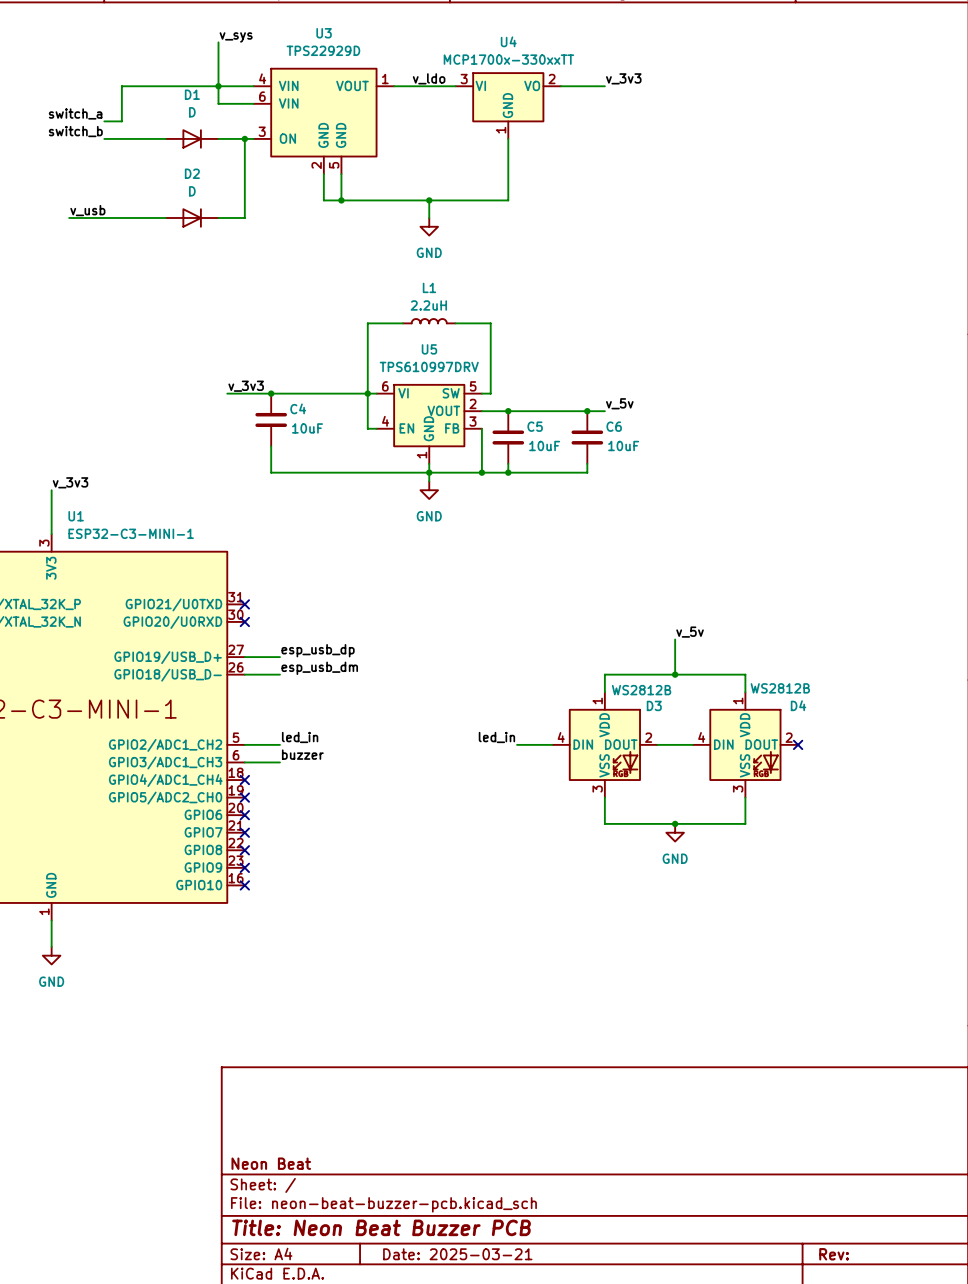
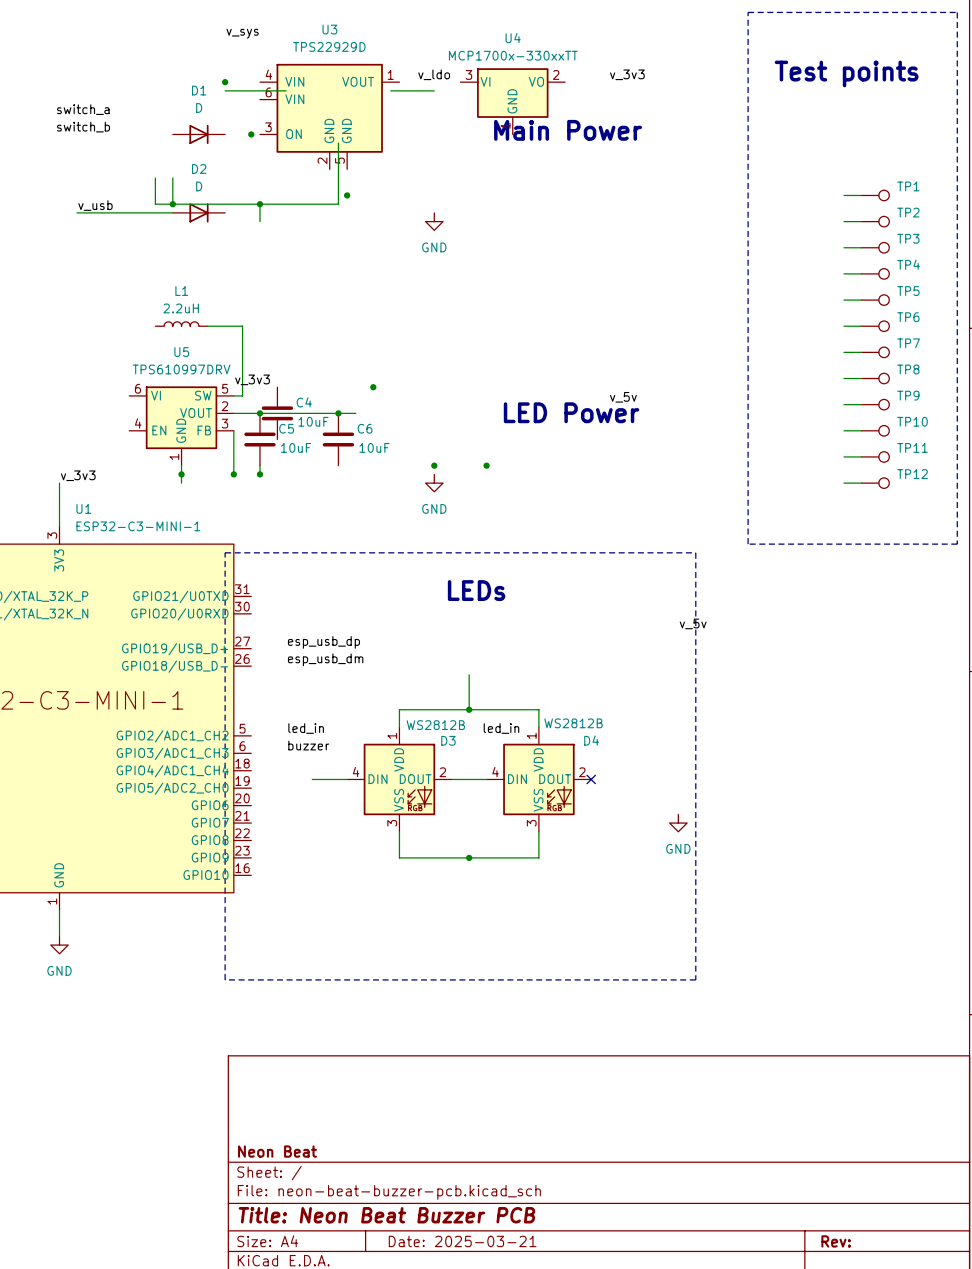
line: none -> (748, 12) (957, 12) (957, 544) (748, 544) (748, 12)
wire: (218, 42) (218, 103) (253, 103) -> none
text: none -> Test points (846, 73)
wire: (253, 86) (121, 86) (121, 121) (104, 121) -> none
wire: (394, 86) (455, 86) -> none
wire: (560, 86) (604, 86) -> none
wire: none -> (390, 90) (434, 90)
text: none -> Main Power (568, 130)
wire: (104, 138) (165, 138) -> (225, 90) (286, 90)
wire: (218, 138) (253, 138) -> none
wire: (244, 138) (244, 217) (218, 217) -> none
wire: (508, 138) (508, 200) (323, 200) (323, 174) -> none
wire: none -> (338, 143) (338, 204) (155, 204) (155, 178)
wire: (341, 174) (341, 200) -> none
wire: none -> (172, 178) (172, 204)
wire: (429, 200) (429, 217) -> none
junction: (429, 200) -> none
wire: none -> (843, 195) (861, 195)
TP1: none -> (875, 195)
junction: none -> (172, 204)
wire: none -> (259, 204) (259, 221)
junction: none -> (259, 204)
wire: none -> (843, 221) (861, 221)
TP2: none -> (875, 221)
wire: none -> (843, 247) (861, 247)
TP3: none -> (875, 247)
wire: none -> (843, 273) (861, 273)
TP4: none -> (875, 273)
wire: none -> (843, 300) (861, 300)
TP5: none -> (875, 300)
L1 position: (429, 321) -> (181, 324)
wire: (402, 323) (367, 323) (367, 428) (376, 428) -> none
wire: (455, 323) (490, 323) (490, 393) (481, 393) -> none
wire: none -> (207, 326) (242, 326) (242, 395) (233, 395)
wire: none -> (843, 326) (861, 326)
TP6: none -> (875, 326)
wire: none -> (843, 352) (861, 352)
TP7: none -> (875, 352)
wire: none -> (843, 378) (861, 378)
TP8: none -> (875, 378)
wire: (227, 393) (376, 393) -> none
junction position: (271, 393) -> (259, 413)
wire: (481, 411) (604, 411) -> none
junction: (508, 411) -> none
junction: (587, 411) -> none
wire: none -> (843, 404) (861, 404)
TP9: none -> (875, 404)
wire: none -> (233, 413) (355, 413)
junction: none -> (338, 413)
text: none -> LED Power (571, 412)
U5 position: (429, 423) -> (181, 426)
wire: (481, 428) (481, 472) -> none
wire: none -> (233, 430) (233, 474)
C5 position: (508, 437) -> (259, 439)
C6 position: (587, 437) -> (338, 439)
wire: none -> (843, 430) (861, 430)
TP10: none -> (875, 430)
wire: (271, 446) (271, 472) (587, 472) (587, 463) -> none
wire: (429, 463) (429, 481) -> none
wire: (508, 463) (508, 472) -> none
wire: none -> (843, 456) (861, 456)
TP11: none -> (875, 456)
wire: none -> (181, 465) (181, 483)
wire: none -> (259, 465) (259, 474)
junction: (508, 472) -> none
junction: none -> (181, 474)
junction: none -> (233, 474)
junction: none -> (259, 474)
wire: none -> (843, 483) (861, 483)
TP12: none -> (875, 483)
line: none -> (225, 552) (695, 552) (695, 979) (225, 979) (225, 552)
text: none -> LEDs (476, 590)
no-connect mark: (244, 604) -> none
no-connect mark: (244, 621) -> none
wire: (675, 639) (675, 674) -> none
wire: (244, 657) (279, 657) -> none
wire: (244, 674) (279, 674) -> none
junction: (675, 674) -> none
wire: none -> (469, 674) (469, 709)
wire: (604, 692) (604, 674) (745, 674) (745, 692) -> none
junction: none -> (469, 709)
wire: none -> (399, 727) (399, 709) (538, 709) (538, 727)
wire: (244, 744) (279, 744) -> none
wire: (517, 744) (552, 744) -> (451, 779) (486, 779)
D3 position: (604, 744) -> (399, 779)
wire: (657, 744) (692, 744) -> none
D4 position: (745, 744) -> (538, 779)
no-connect mark: (798, 744) -> none
wire: (244, 762) (279, 762) -> (312, 779) (347, 779)
no-connect mark: (244, 780) -> none
no-connect mark: none -> (591, 779)
no-connect mark: (244, 797) -> none
wire: (604, 797) (604, 823) (745, 823) (745, 797) -> none
no-connect mark: (244, 815) -> none
junction: (675, 823) -> none
no-connect mark: (244, 832) -> none
wire: none -> (399, 831) (399, 857) (538, 857) (538, 831)
no-connect mark: (244, 850) -> none
no-connect mark: (244, 867) -> none
junction: none -> (469, 857)
no-connect mark: (244, 885) -> none

